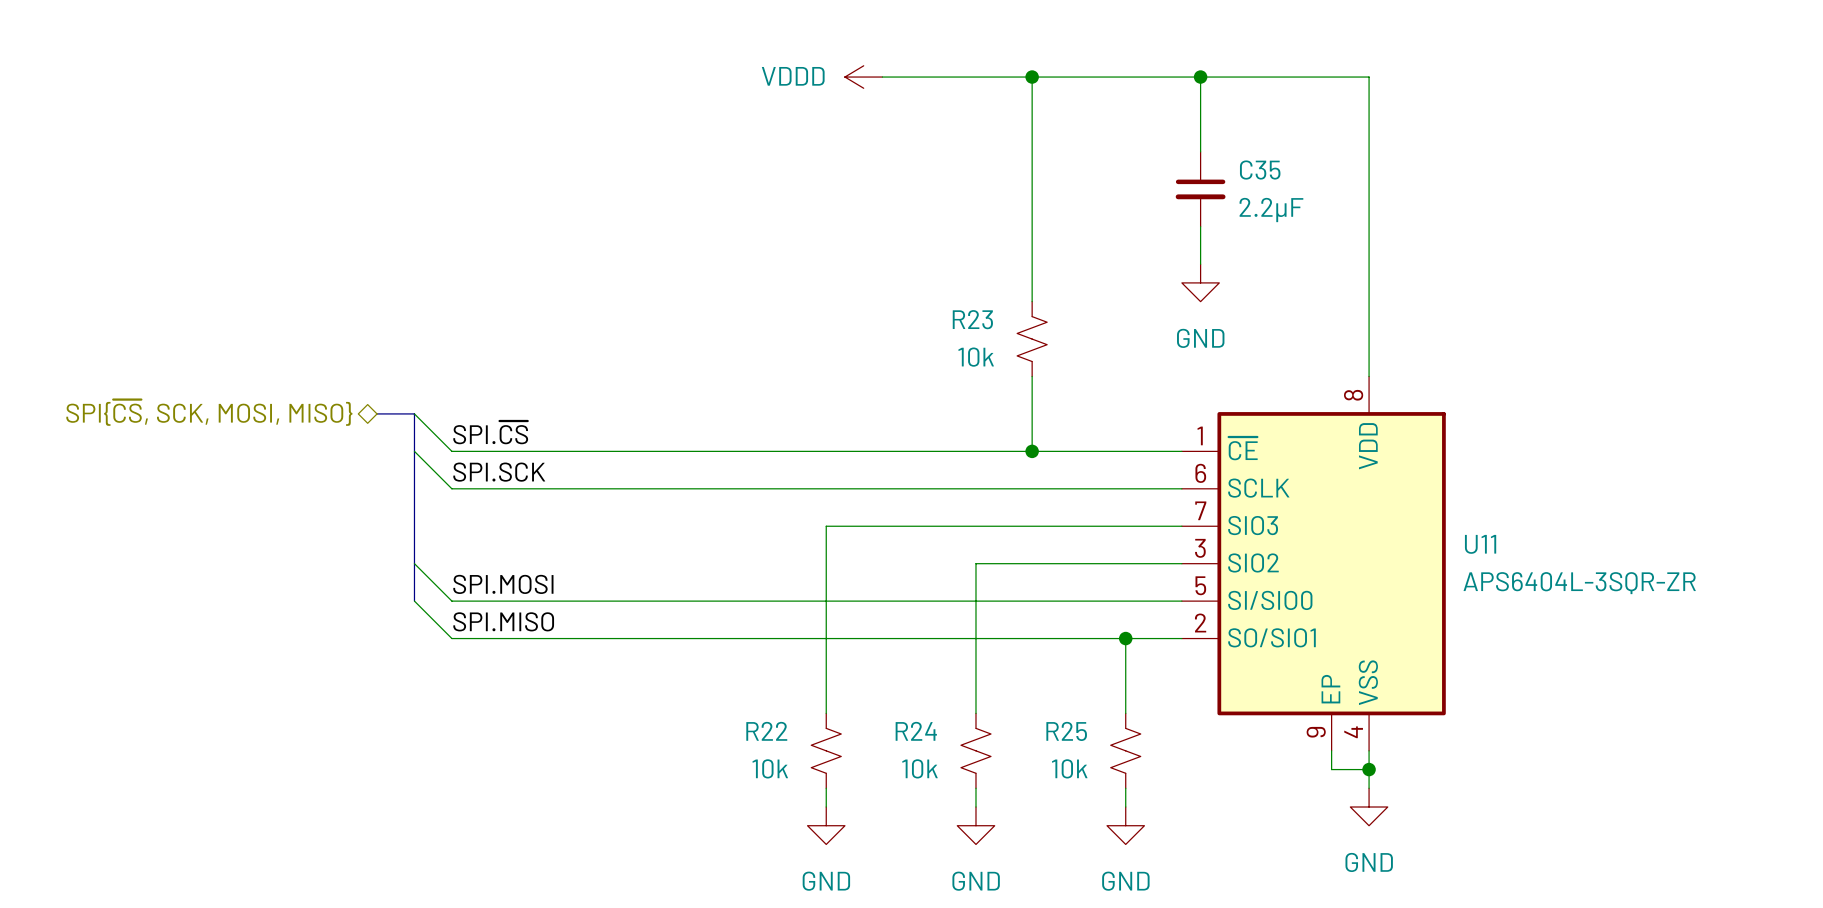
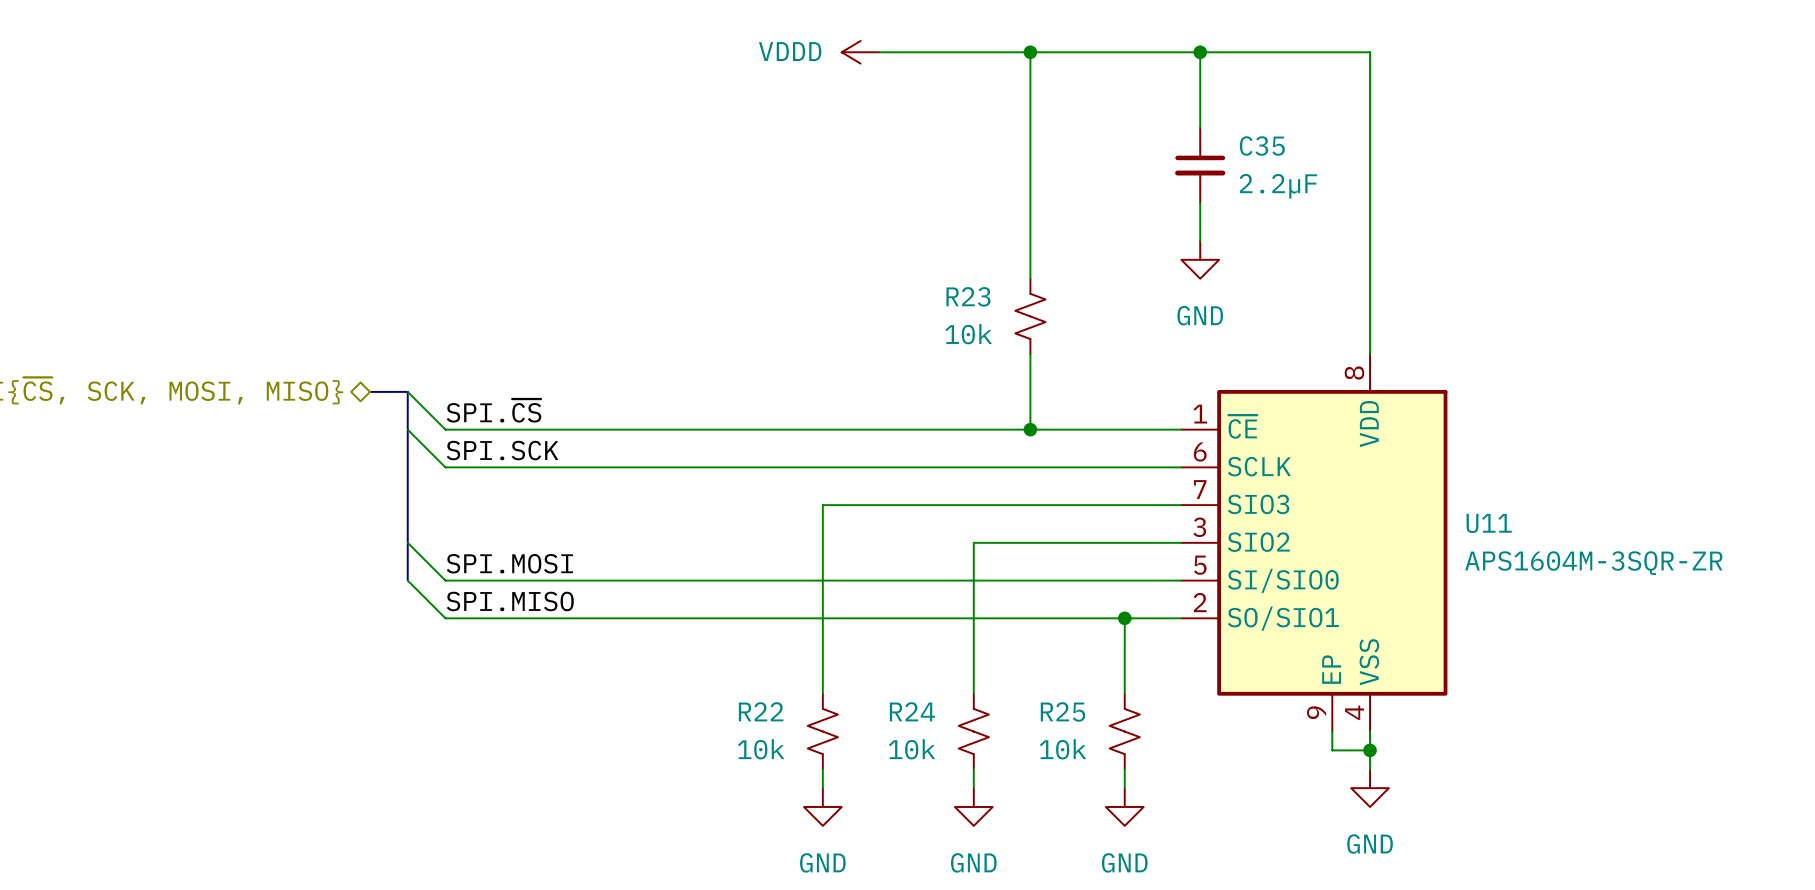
U11 value: APS6404L-3SQR-ZR (1579, 583) -> APS1604M-3SQR-ZR (1593, 563)

